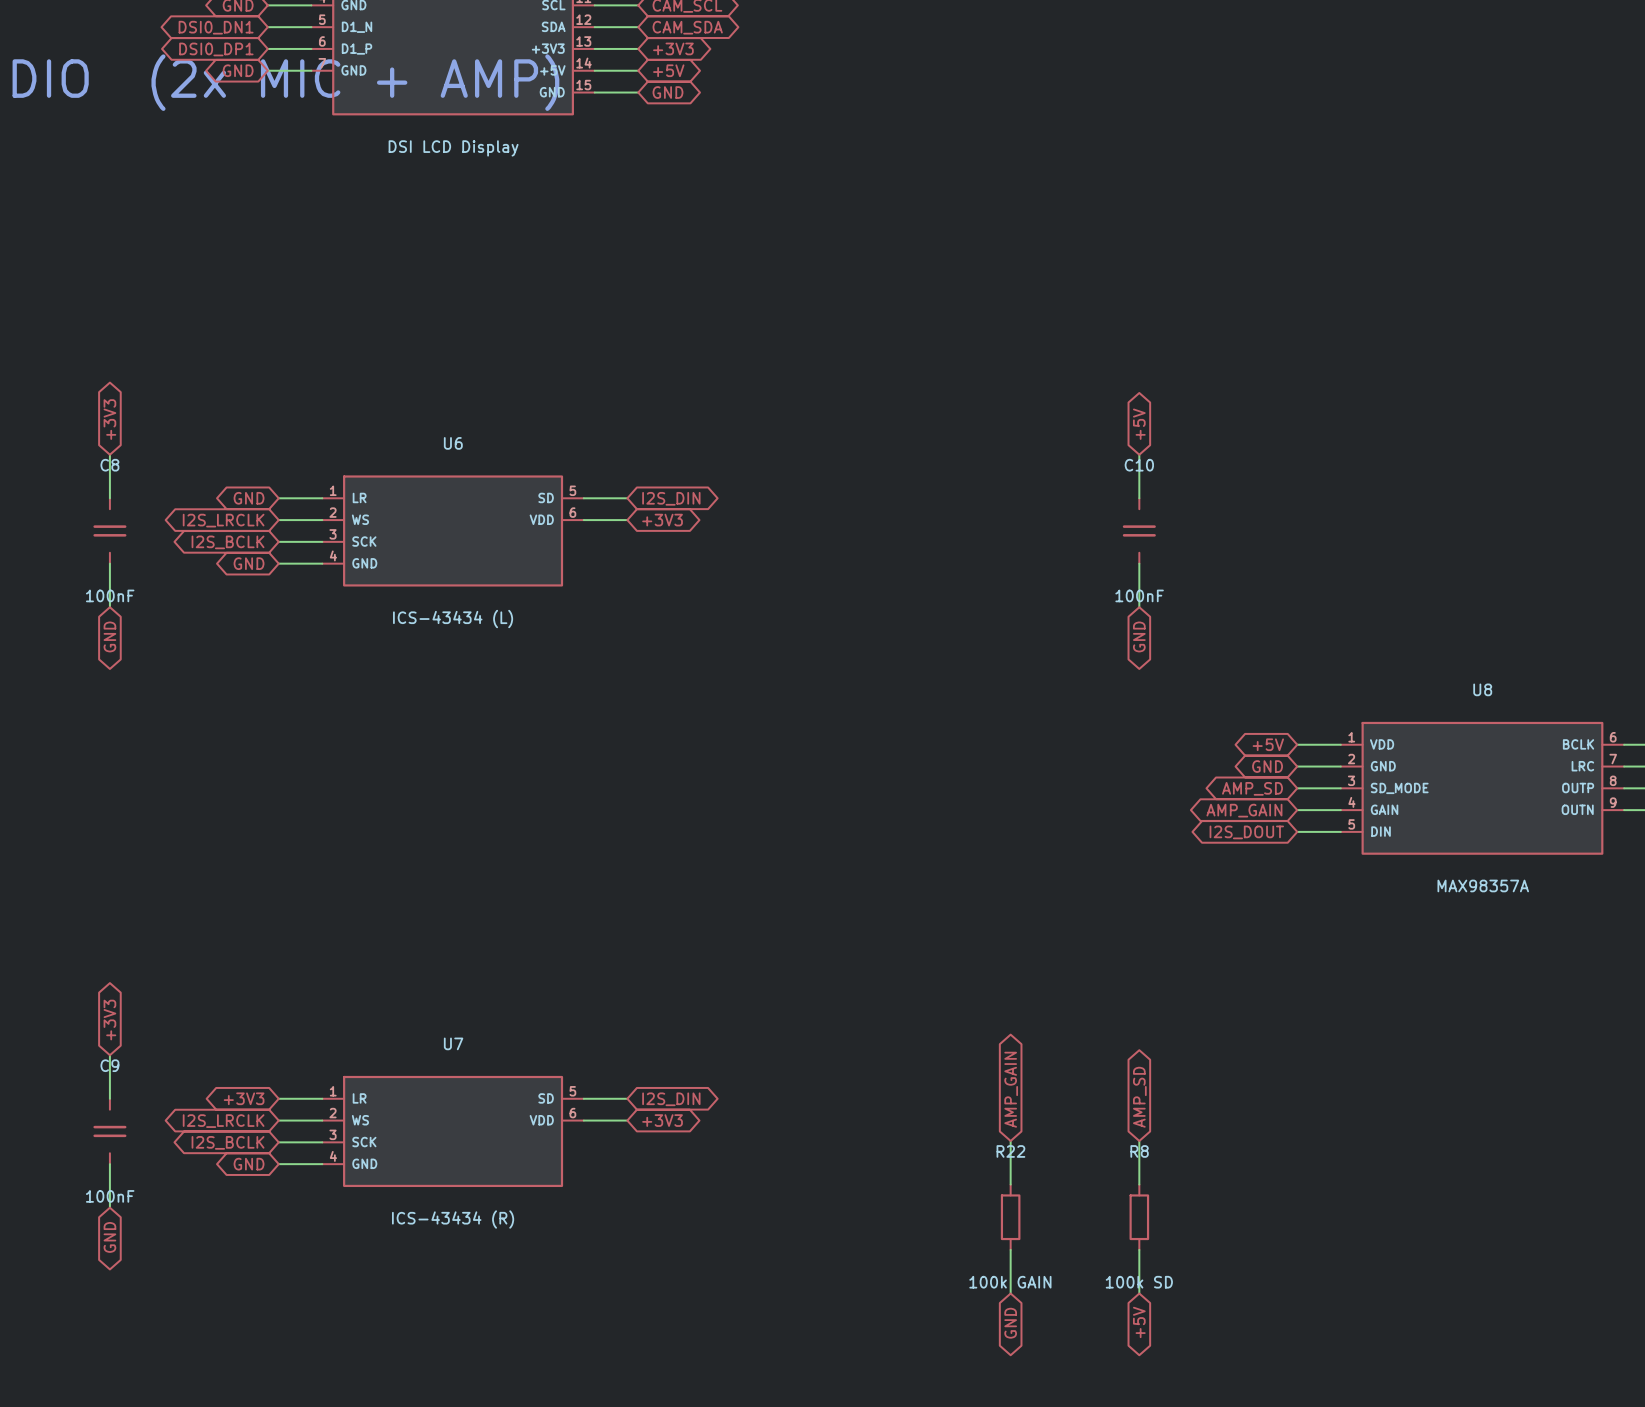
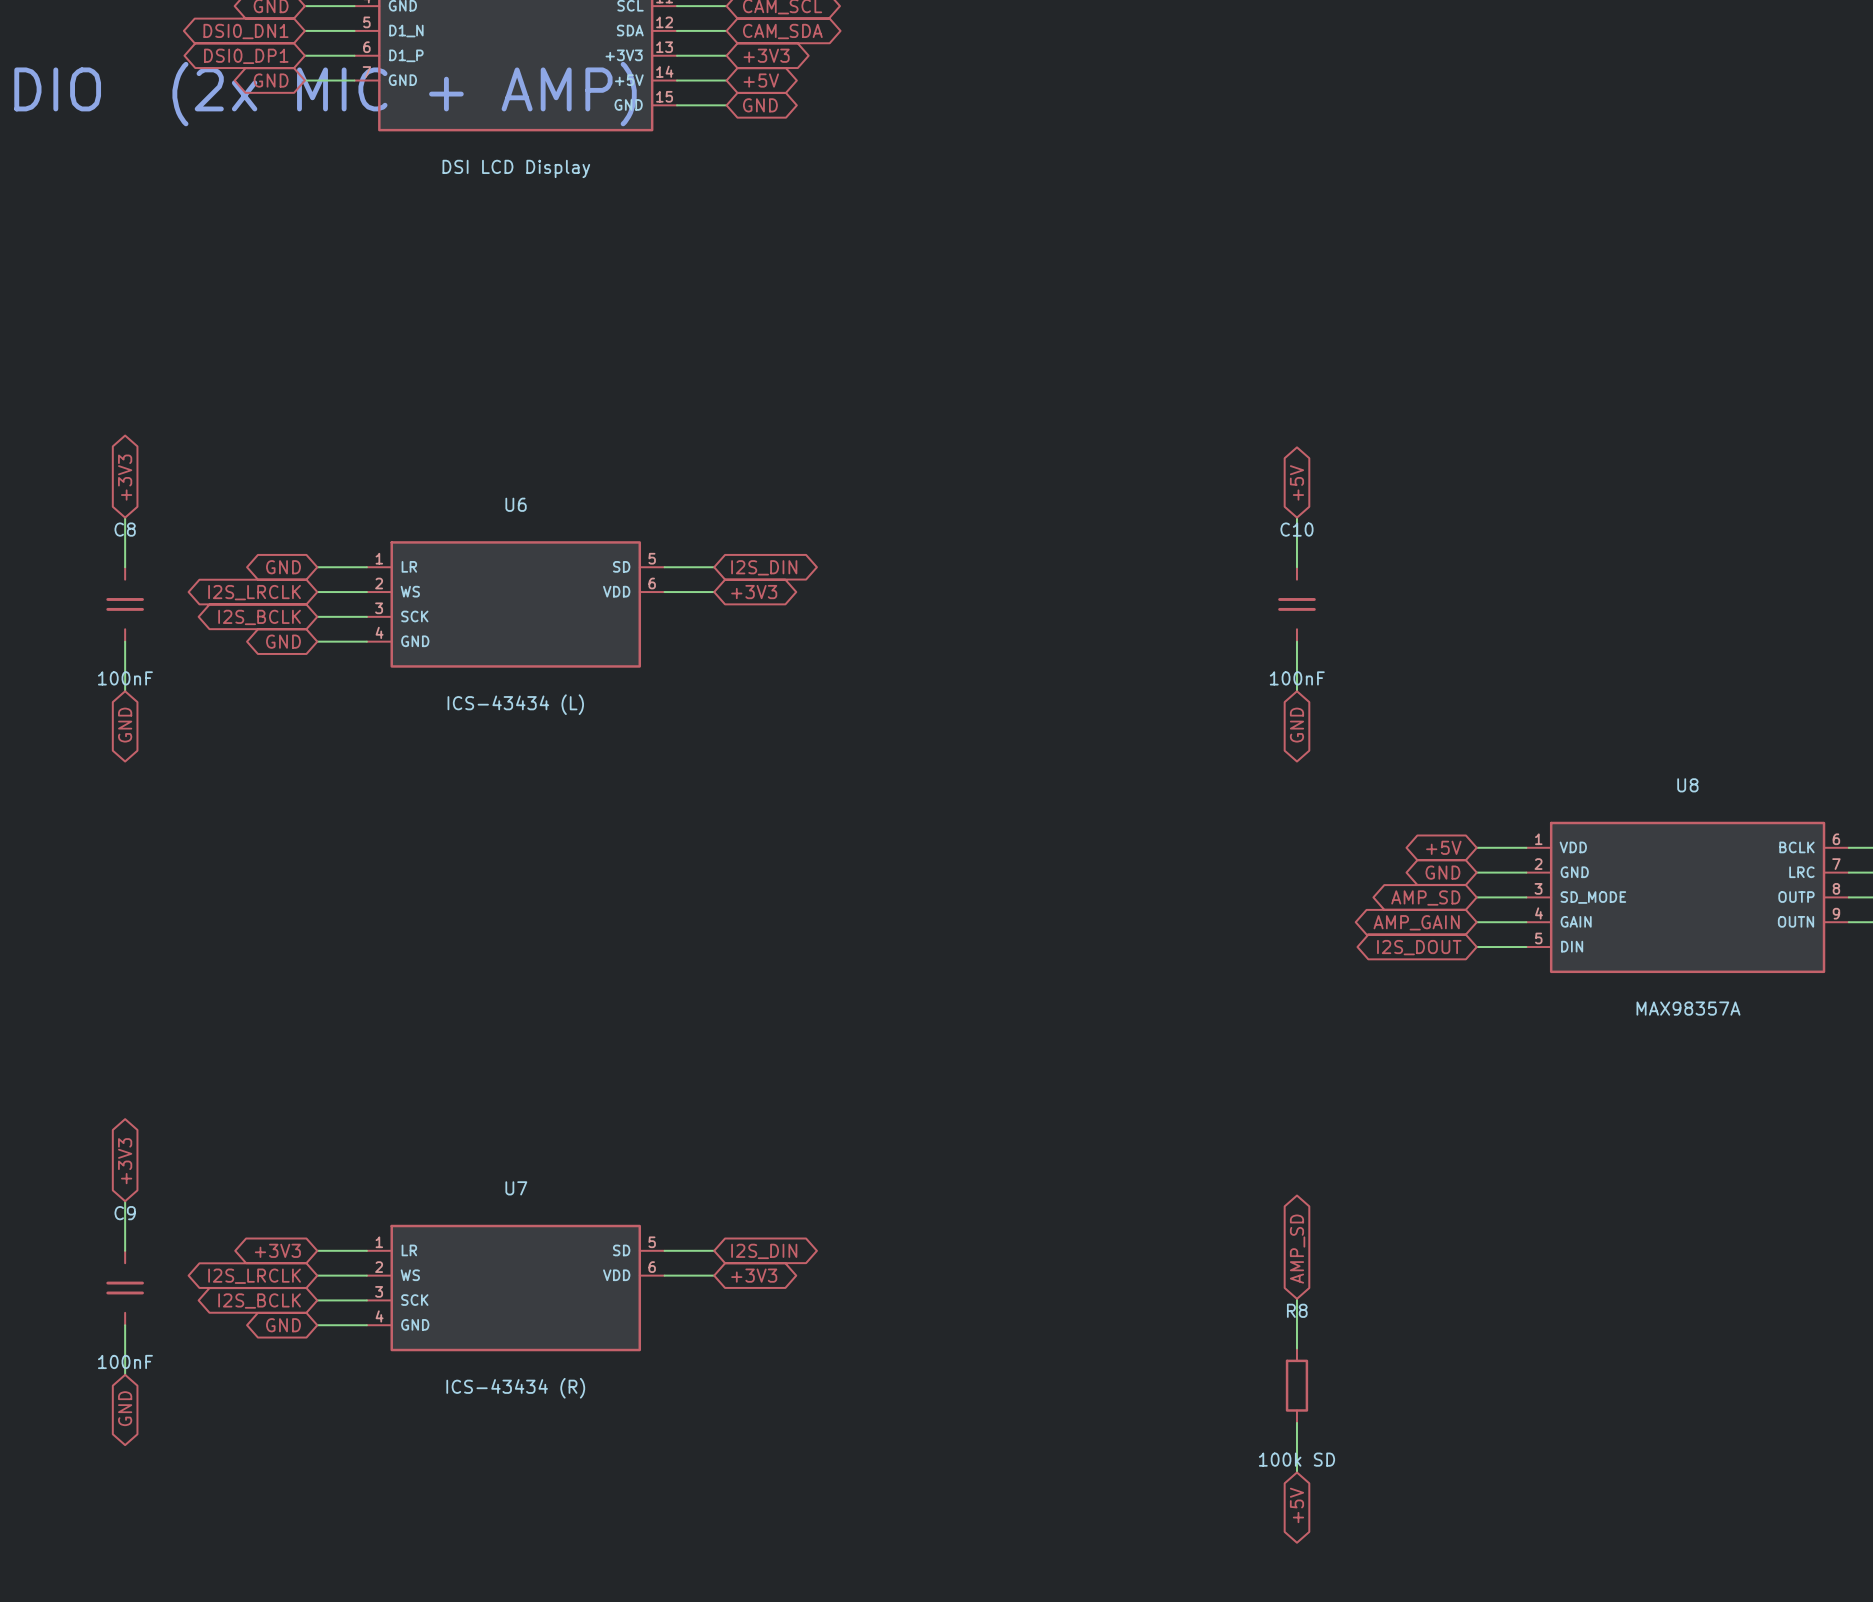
global label: AMP_GAIN (1011, 1089) -> none
wire: (1010, 1140) (1010, 1184) -> none
R22: 100k GAIN (1010, 1217) -> none
wire: (1010, 1249) (1010, 1293) -> none
global label: GND (1010, 1323) -> none

